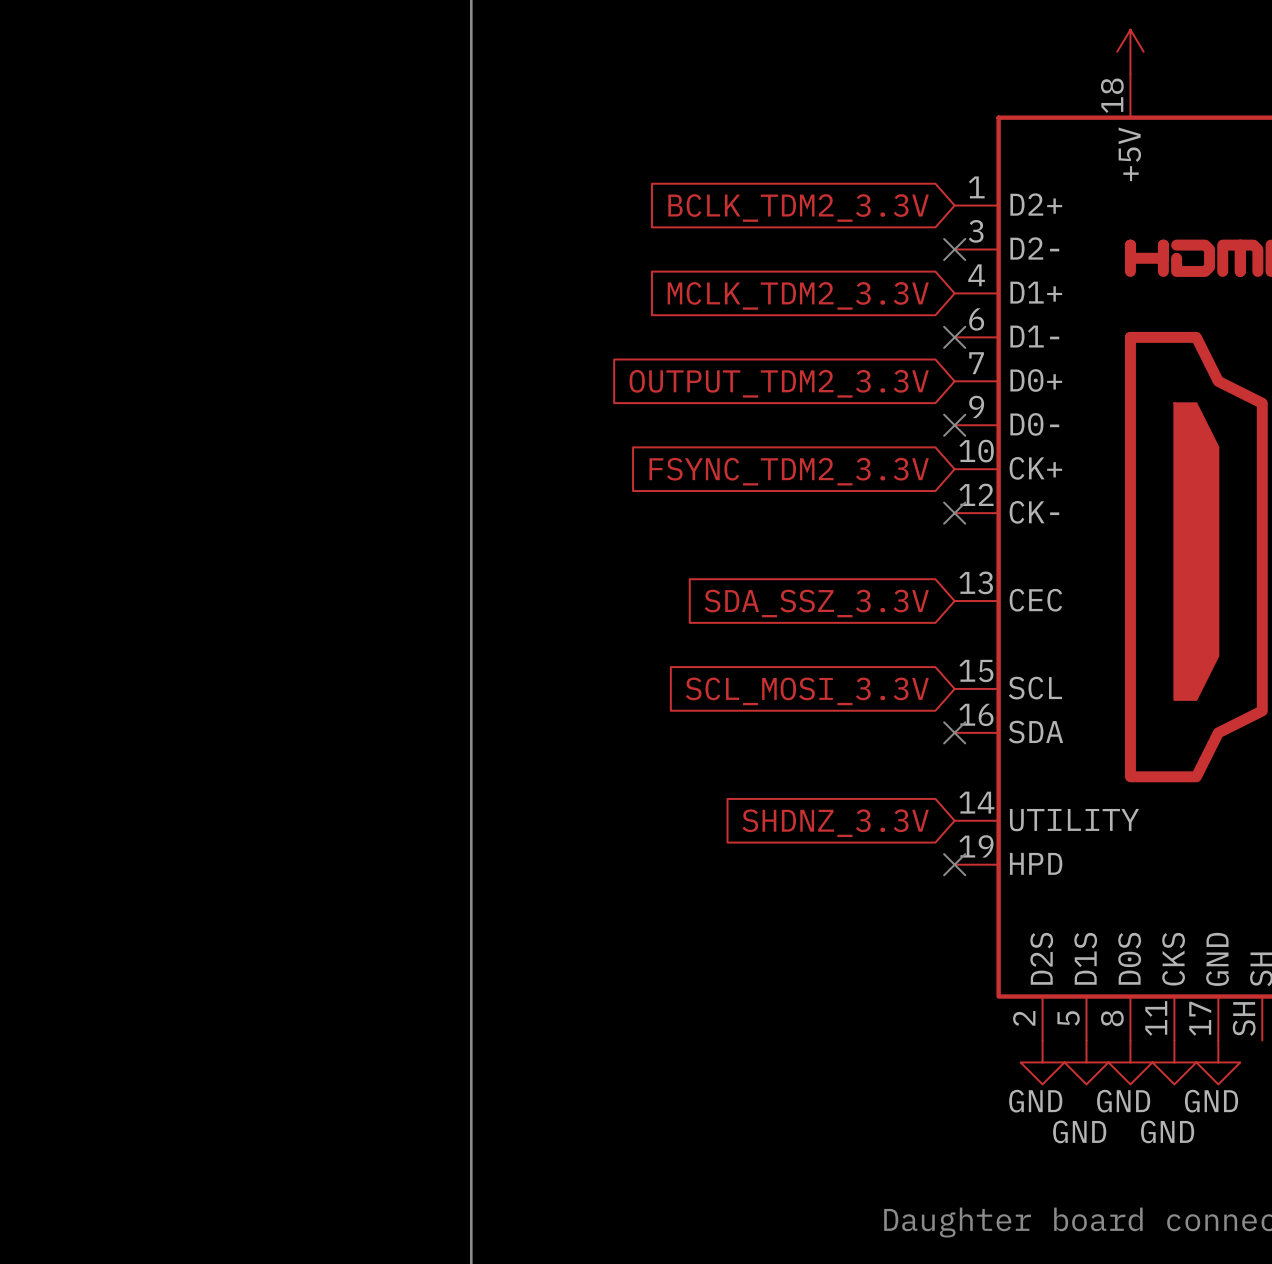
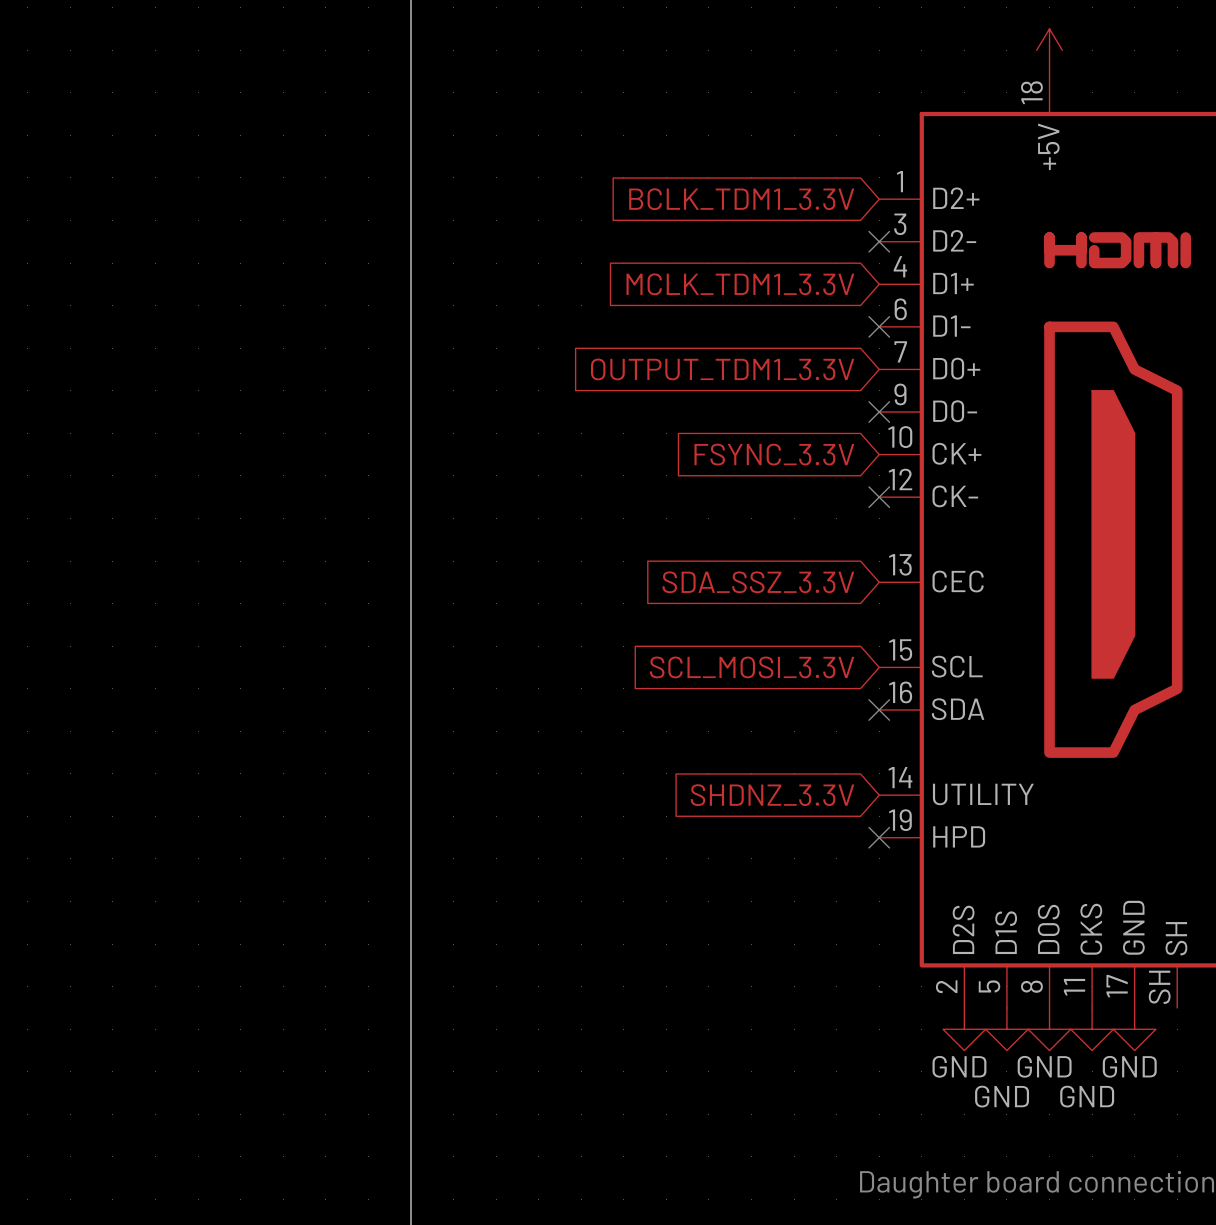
global label: BCLK_TDM2_3.3V (798, 208) -> BCLK_TDM1_3.3V (741, 199)
global label: MCLK_TDM2_3.3V (798, 295) -> MCLK_TDM1_3.3V (740, 284)
global label: OUTPUT_TDM2_3.3V (779, 383) -> OUTPUT_TDM1_3.3V (722, 369)
global label: FSYNC_TDM2_3.3V (789, 471) -> FSYNC_3.3V (774, 454)

